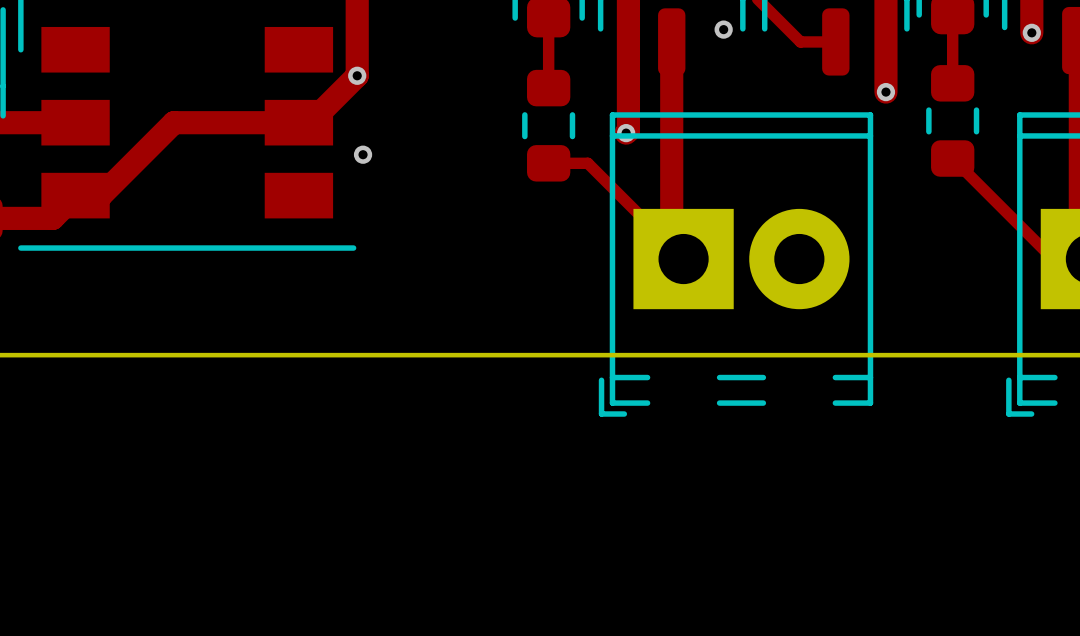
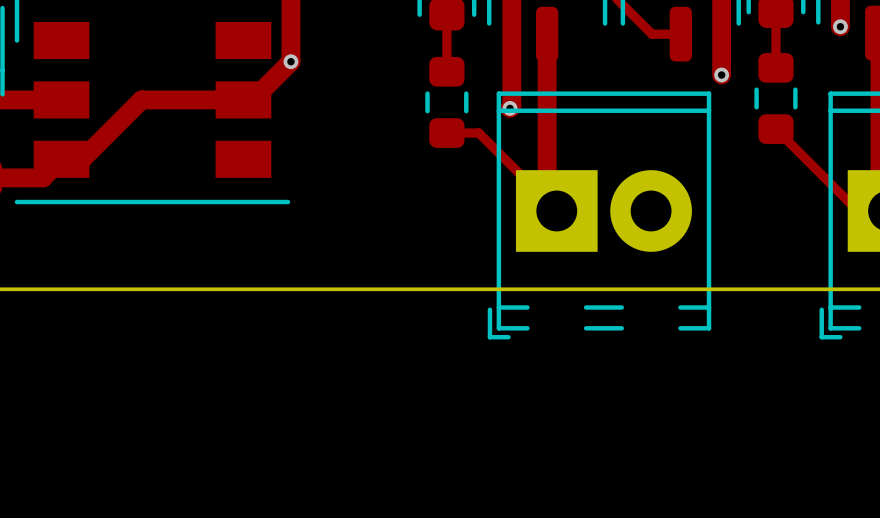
via: (723, 29) -> none
via: (363, 154) -> none

